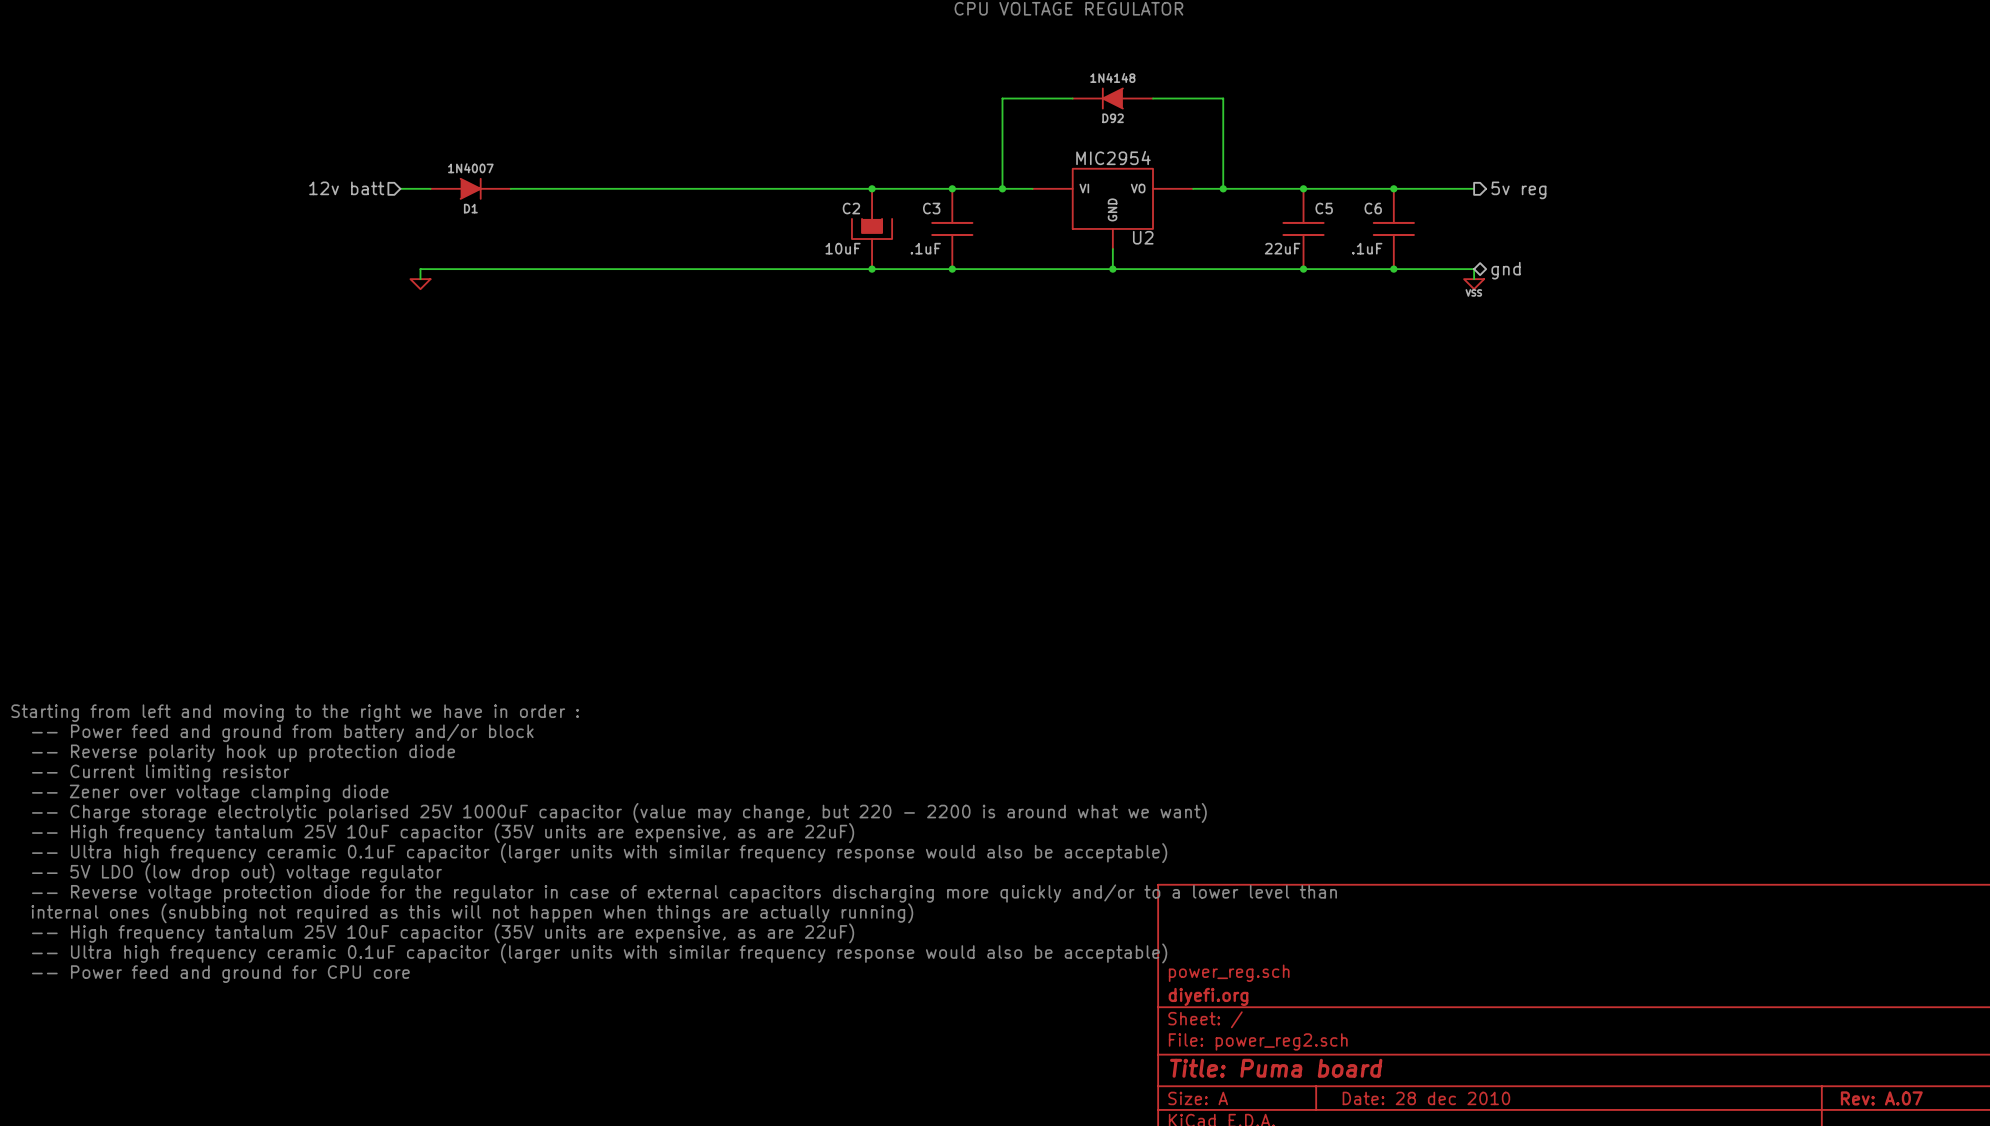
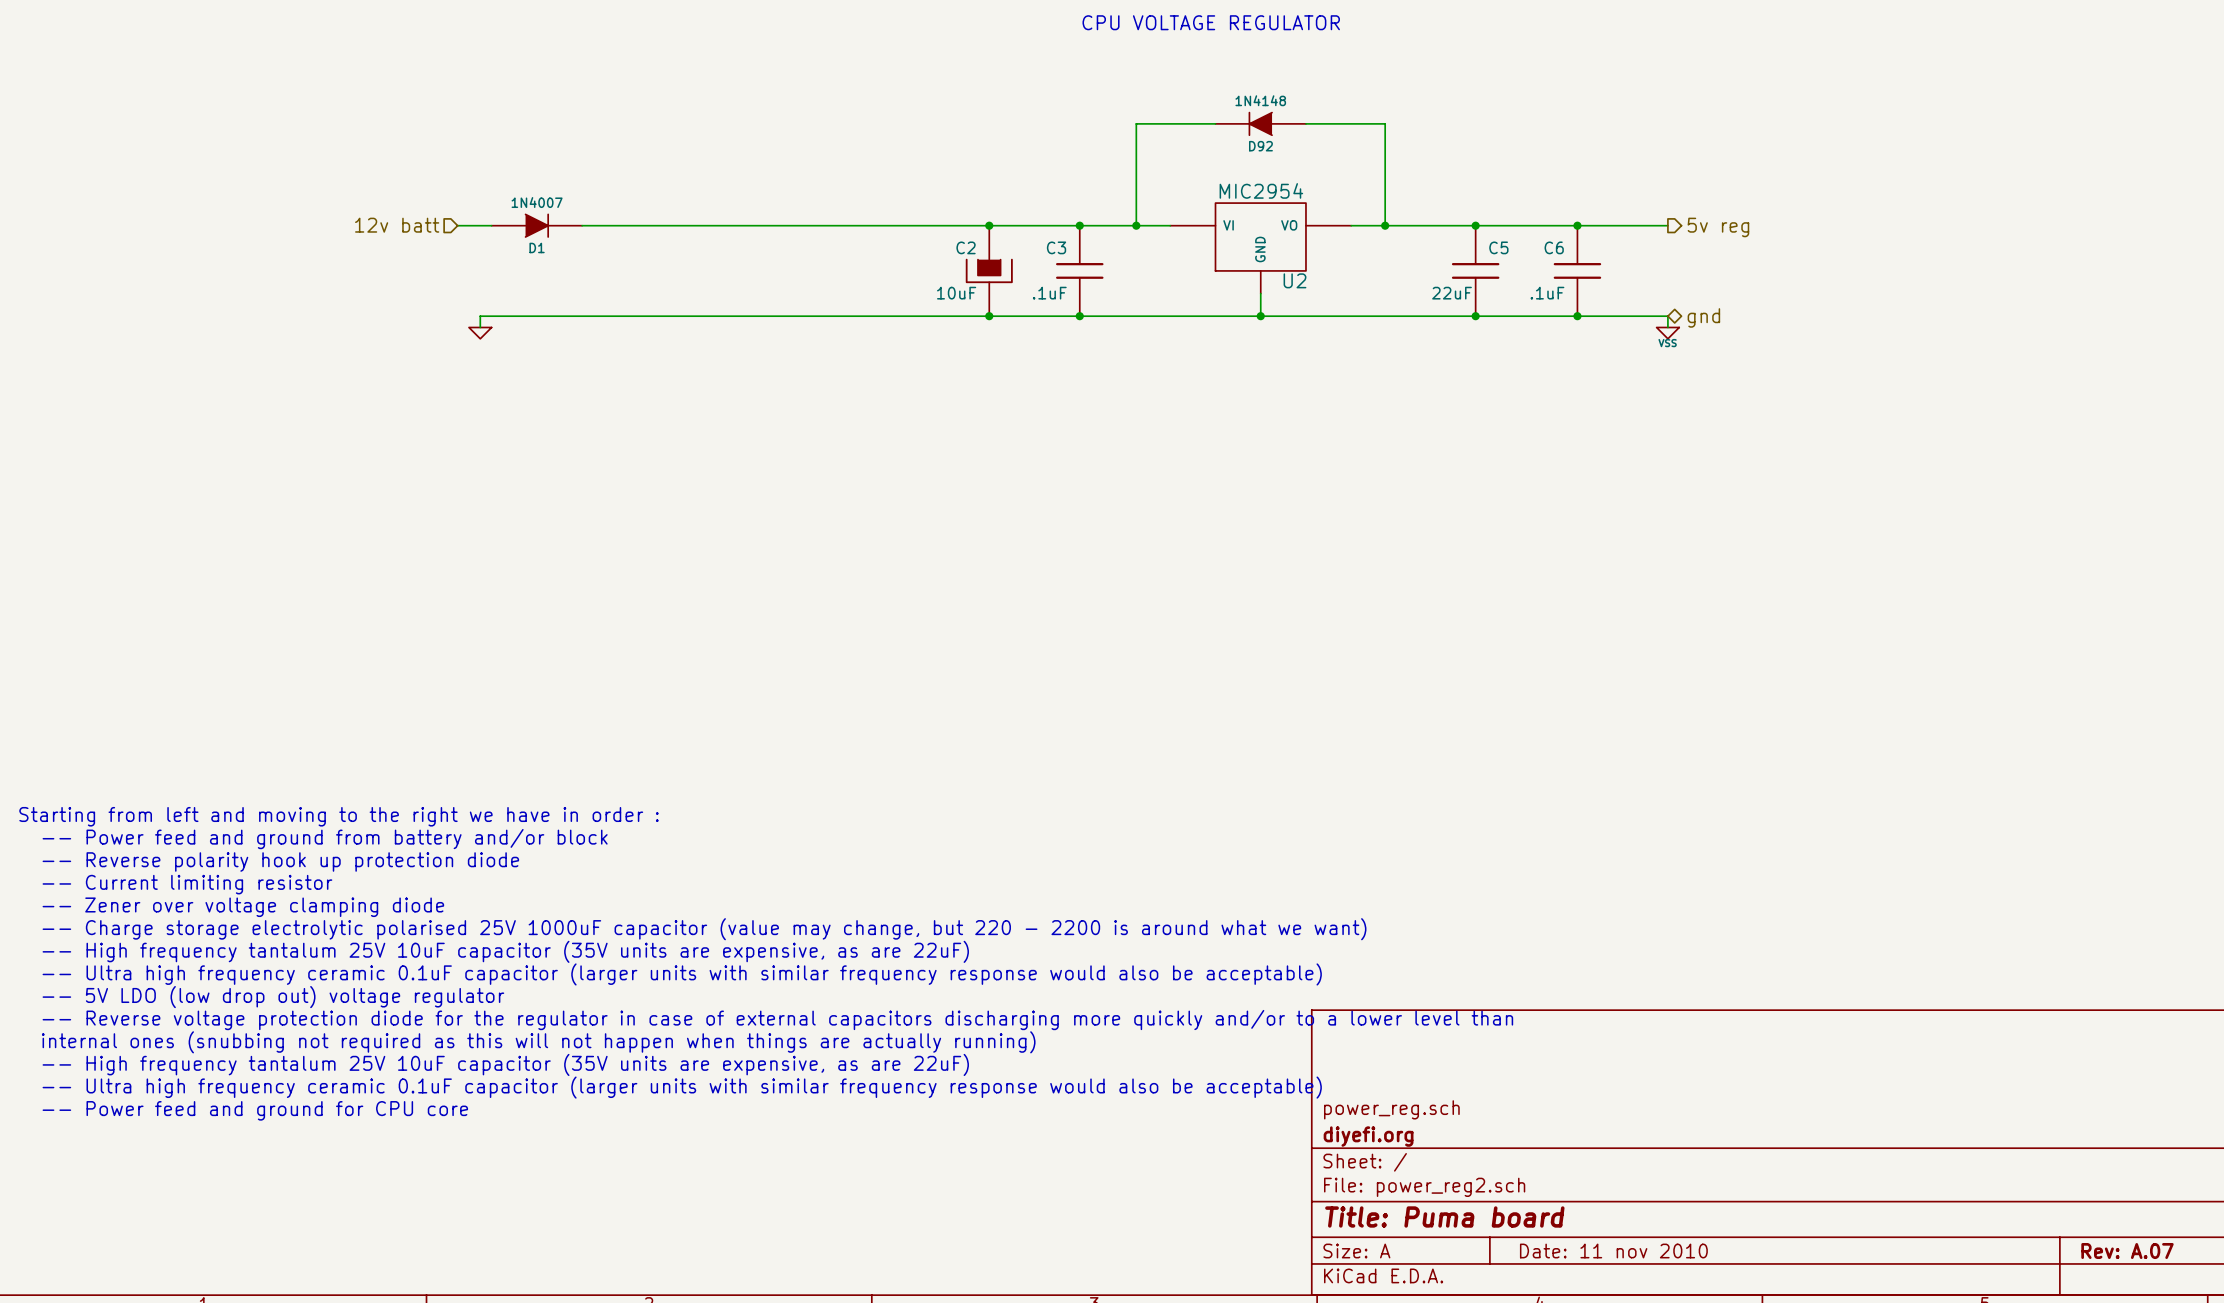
title block: Date: 28 dec 2010 (1426, 1098) -> Date: 11 nov 2010 (1613, 1251)

